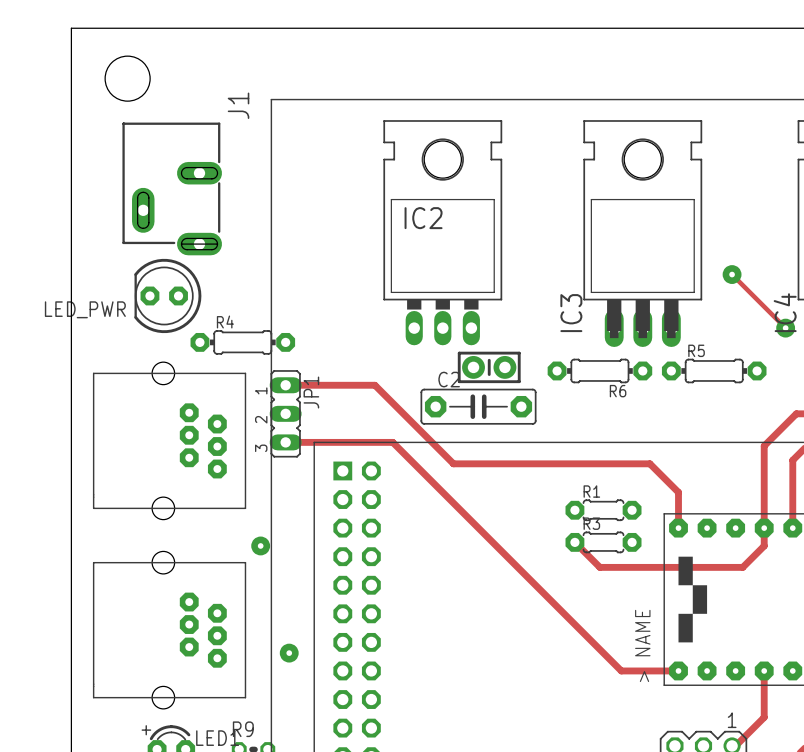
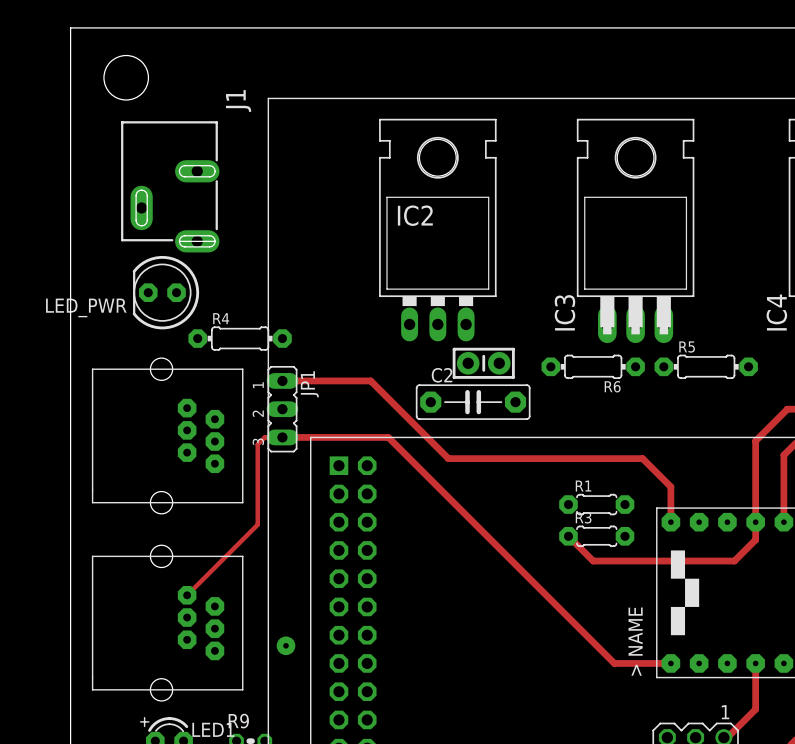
track: (732, 274) (785, 328) -> none
via: (732, 274) -> none
via: (785, 328) -> none
track: none -> (282, 437) (264, 437) (257, 444) (257, 524) (187, 595)
via: (260, 545) -> none

